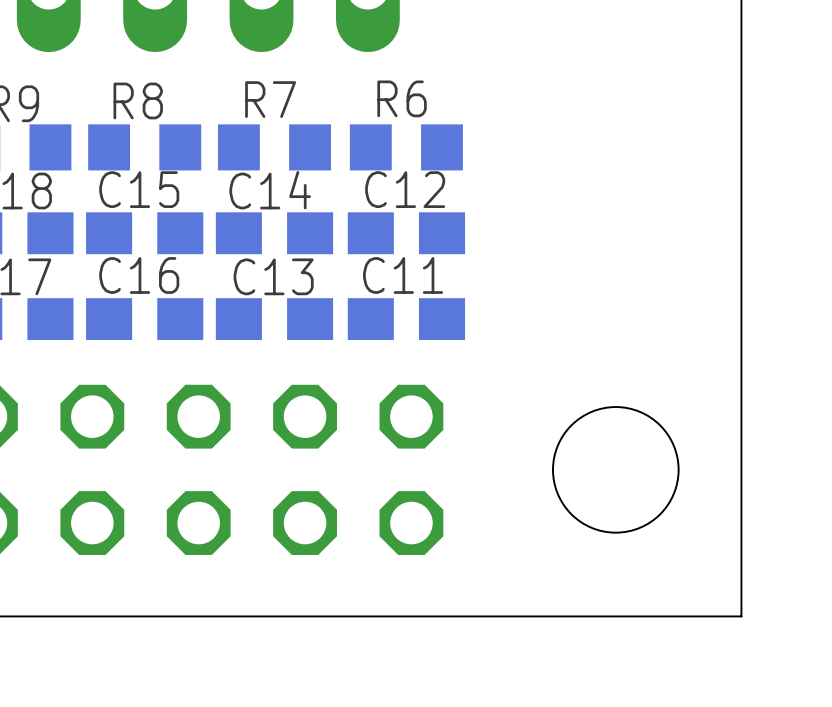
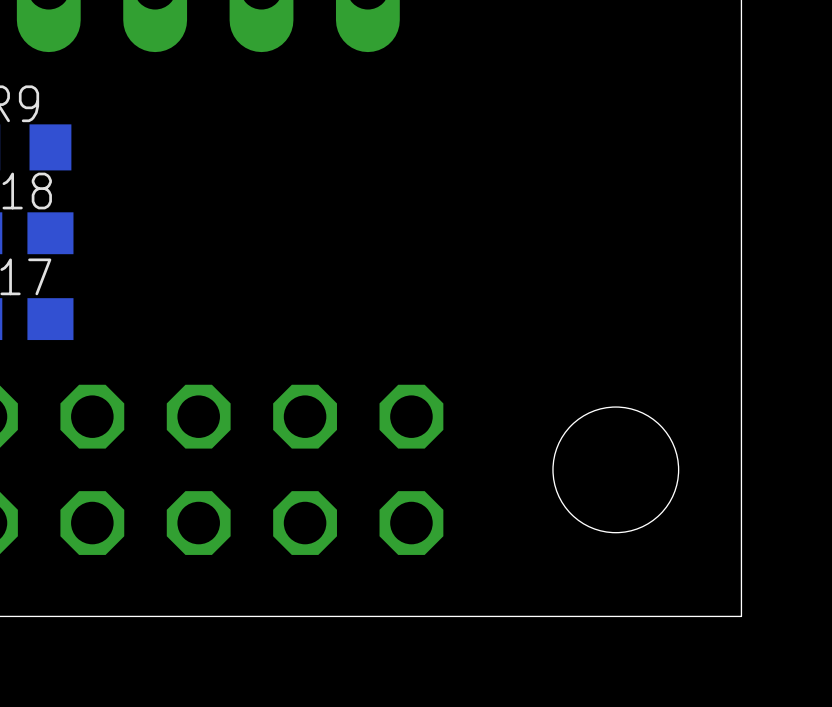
R8: (144, 147) -> none
R7: (274, 147) -> none
R6: (406, 147) -> none
C15: (144, 233) -> none
C14: (274, 233) -> none
C12: (406, 233) -> none
C16: (144, 319) -> none
C13: (274, 319) -> none
C11: (406, 319) -> none

